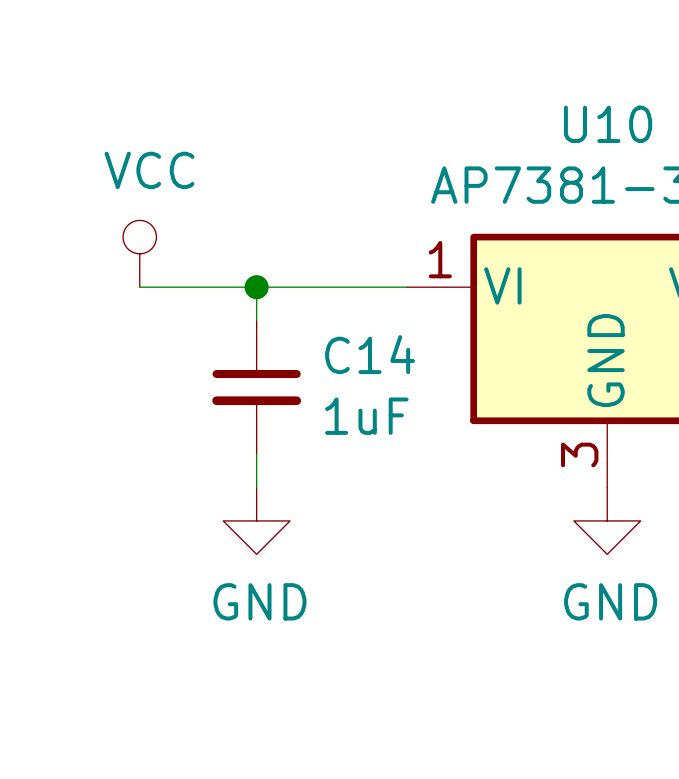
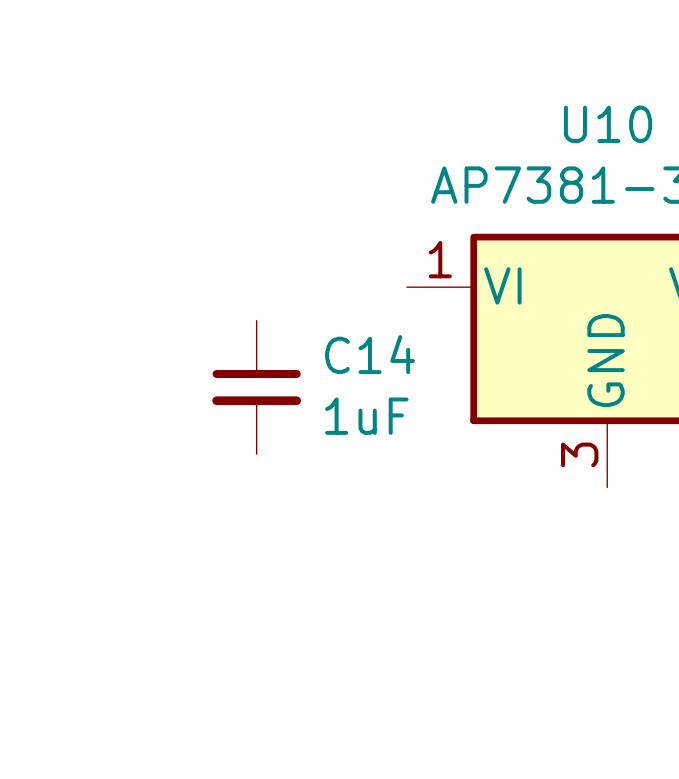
power symbol: VCC (139, 253) -> none
wire: (139, 287) (406, 287) -> none
wire: (256, 287) (256, 320) -> none
junction: (256, 287) -> none
wire: (256, 454) (256, 487) -> none
power symbol: GND (256, 520) -> none
power symbol: GND (607, 520) -> none

